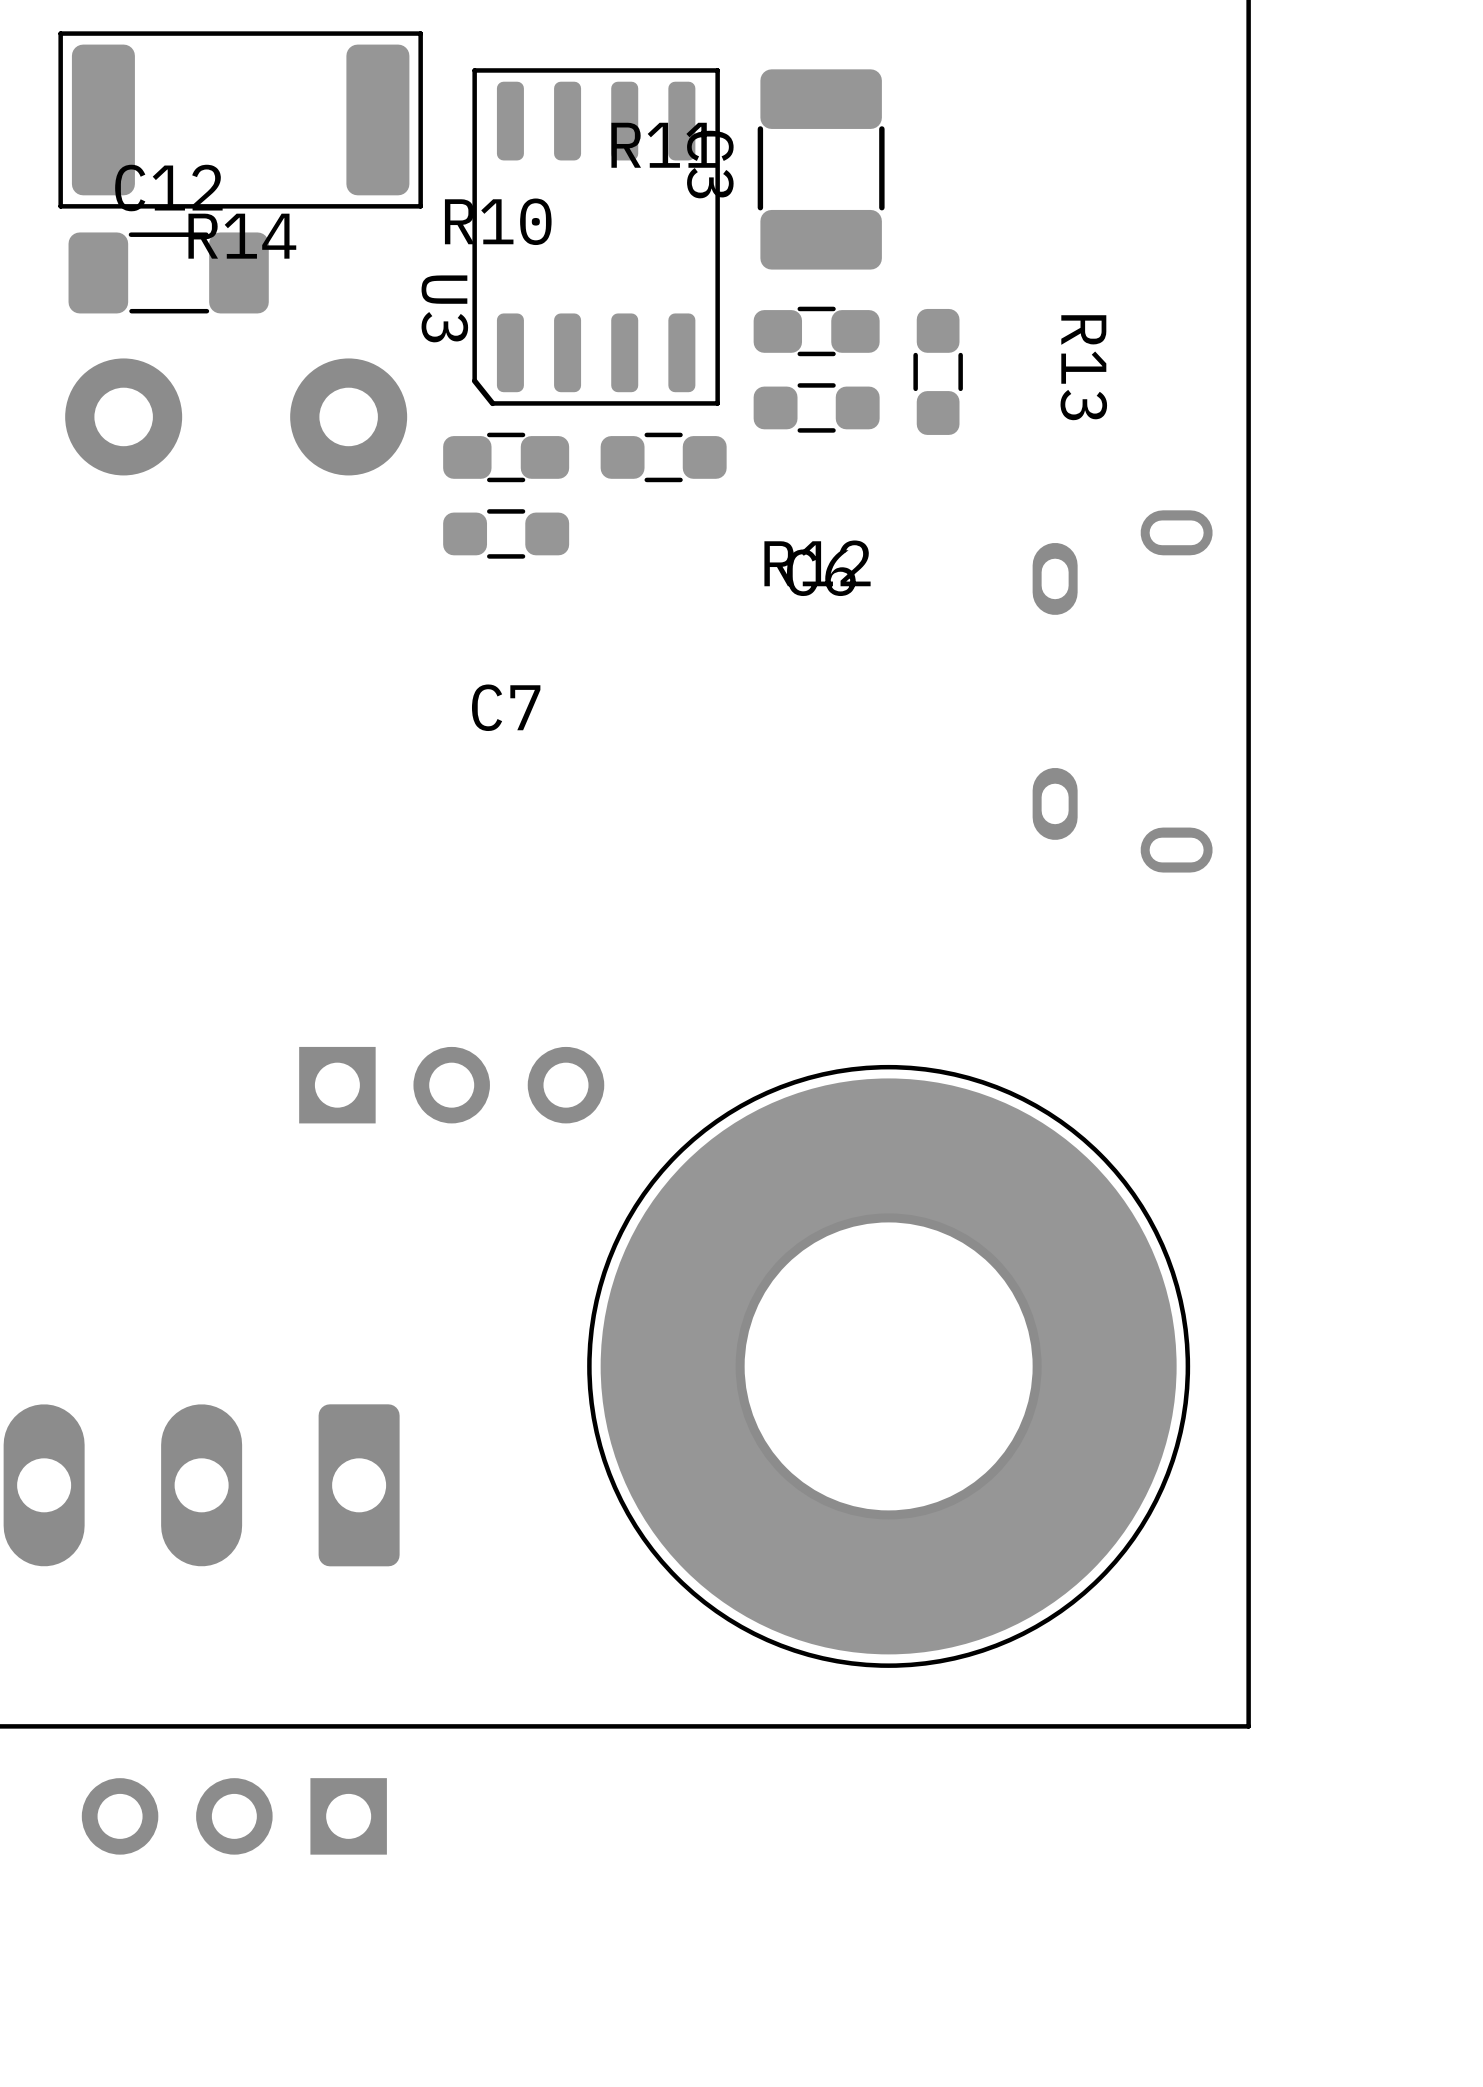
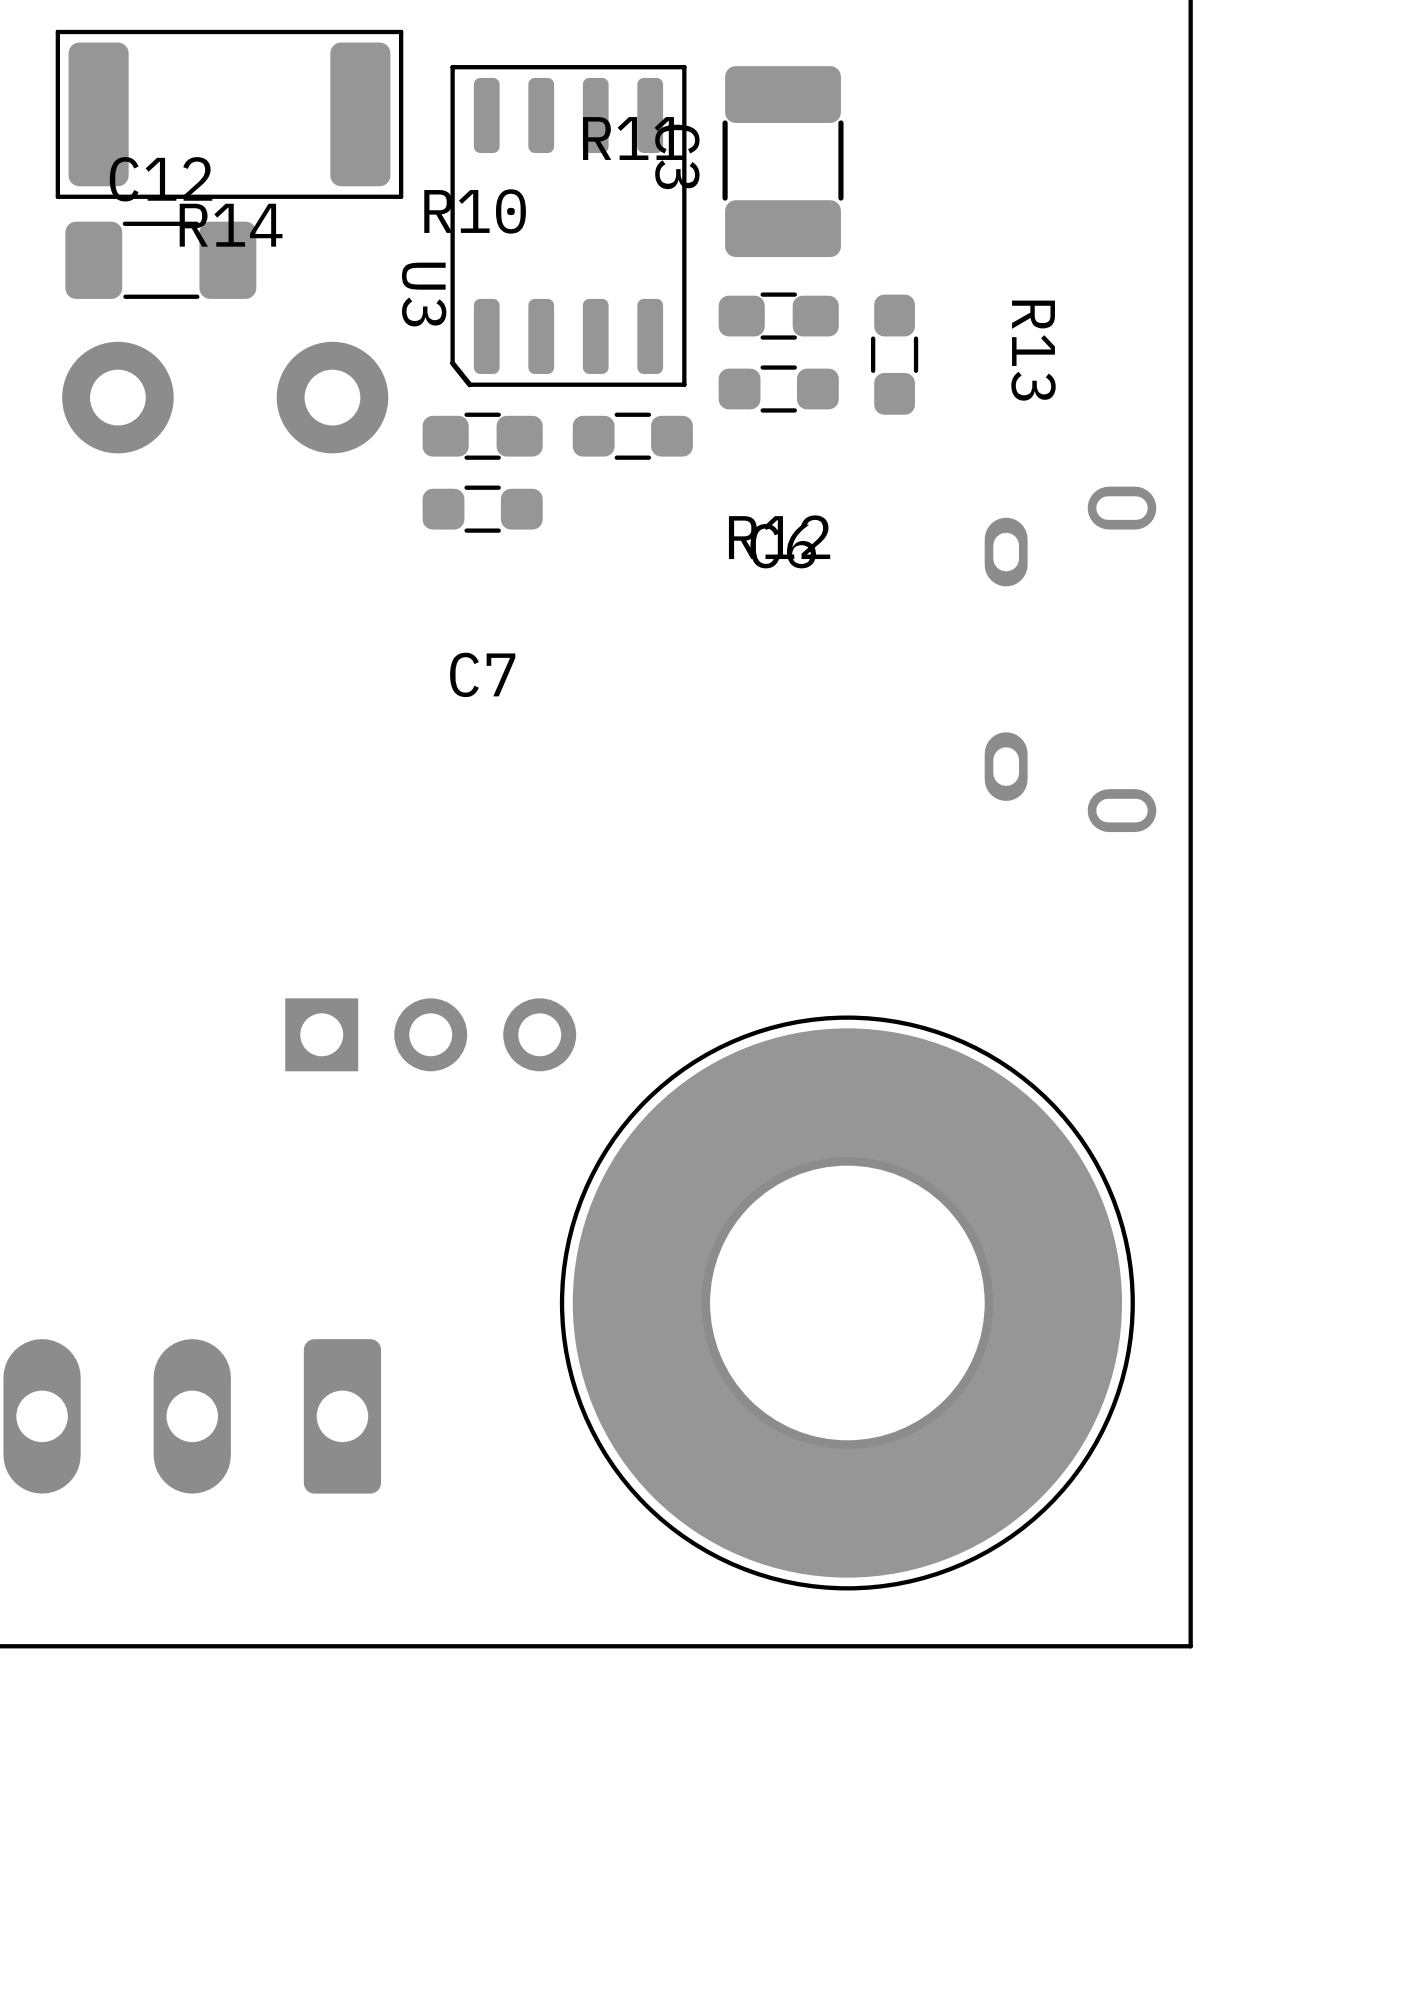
part: (234, 1816) -> none

